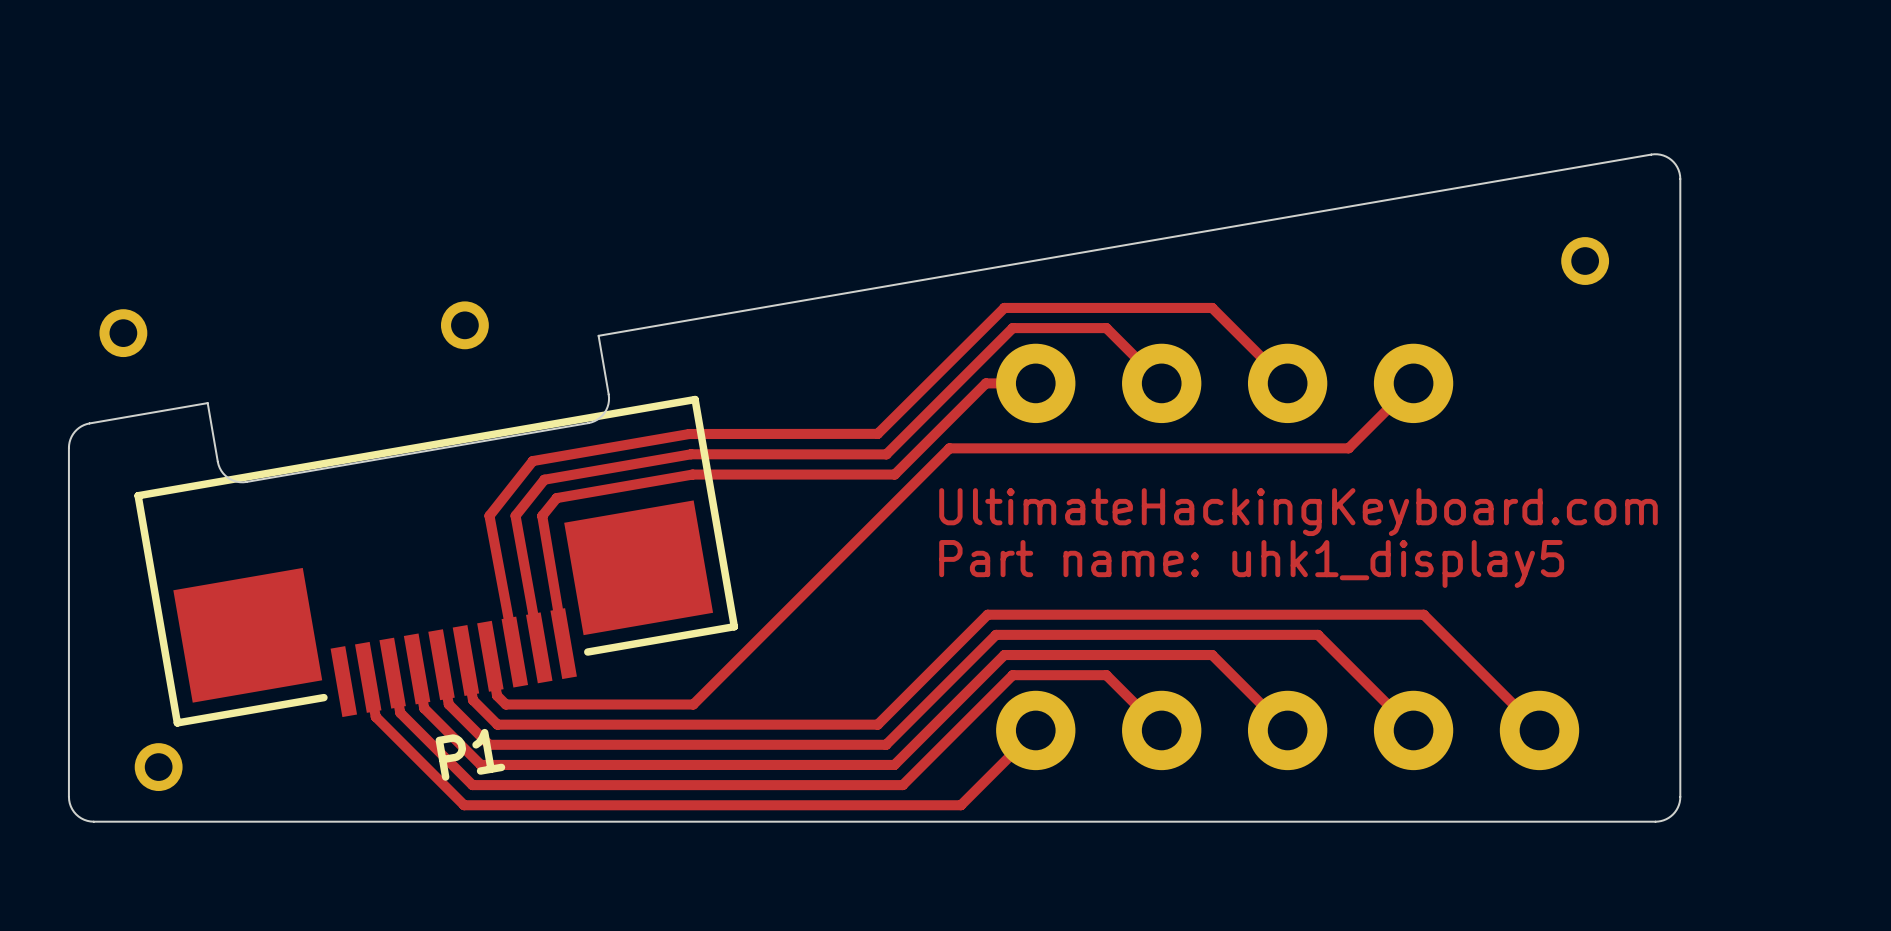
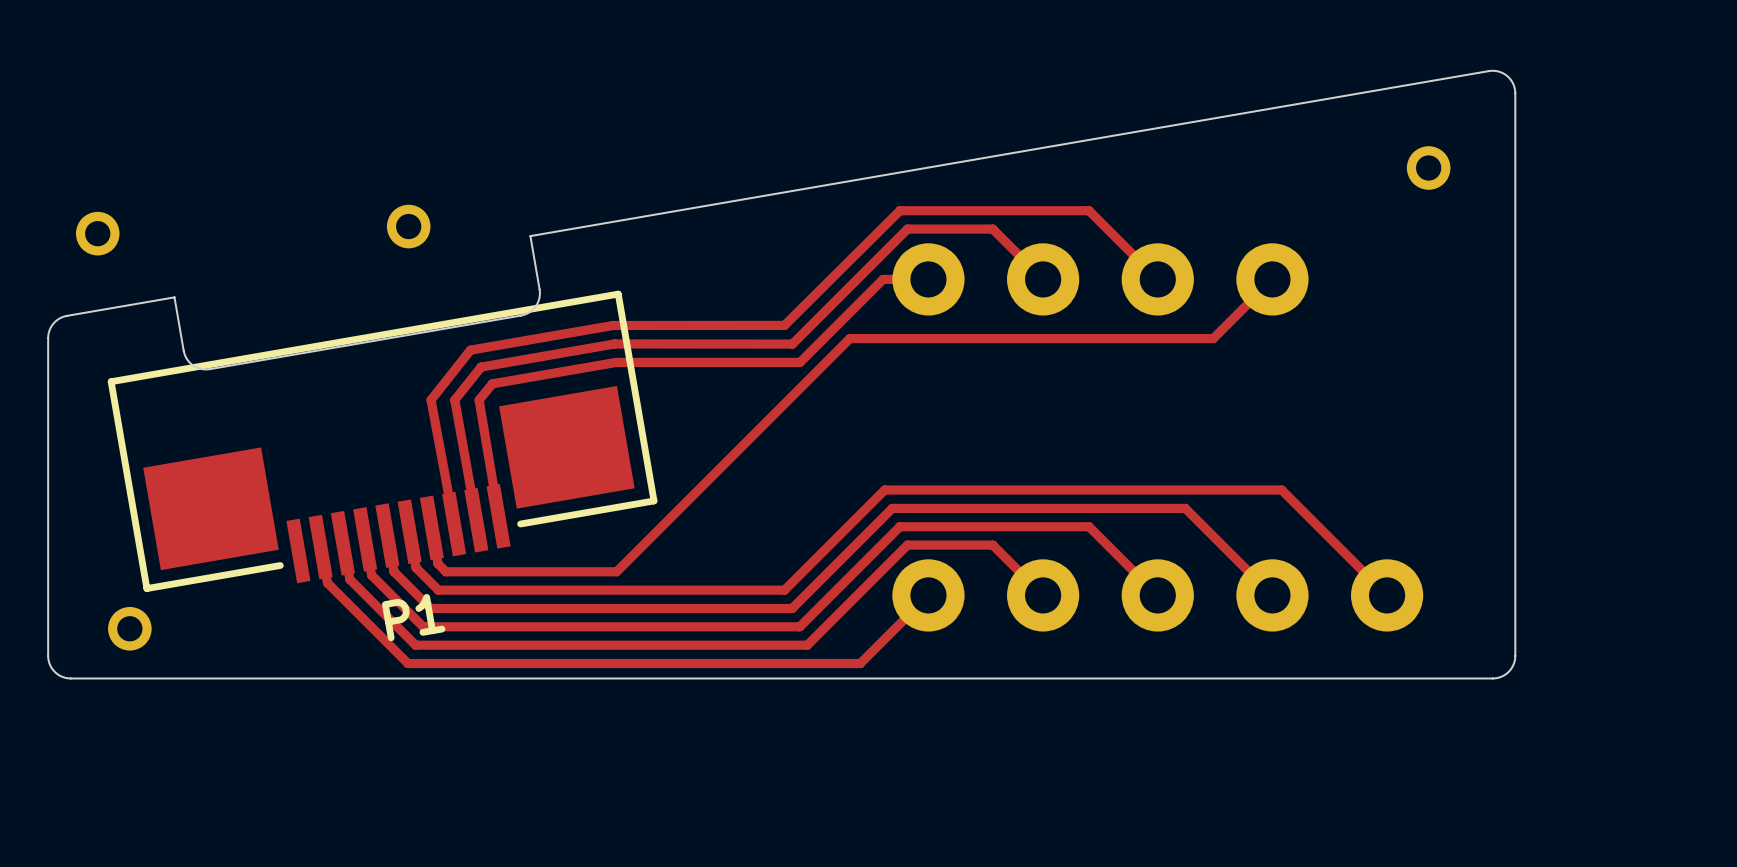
text: UltimateHackingKeyboard.com (1298, 512) -> none
text: Part name: uhk1_display5 (1251, 563) -> none

